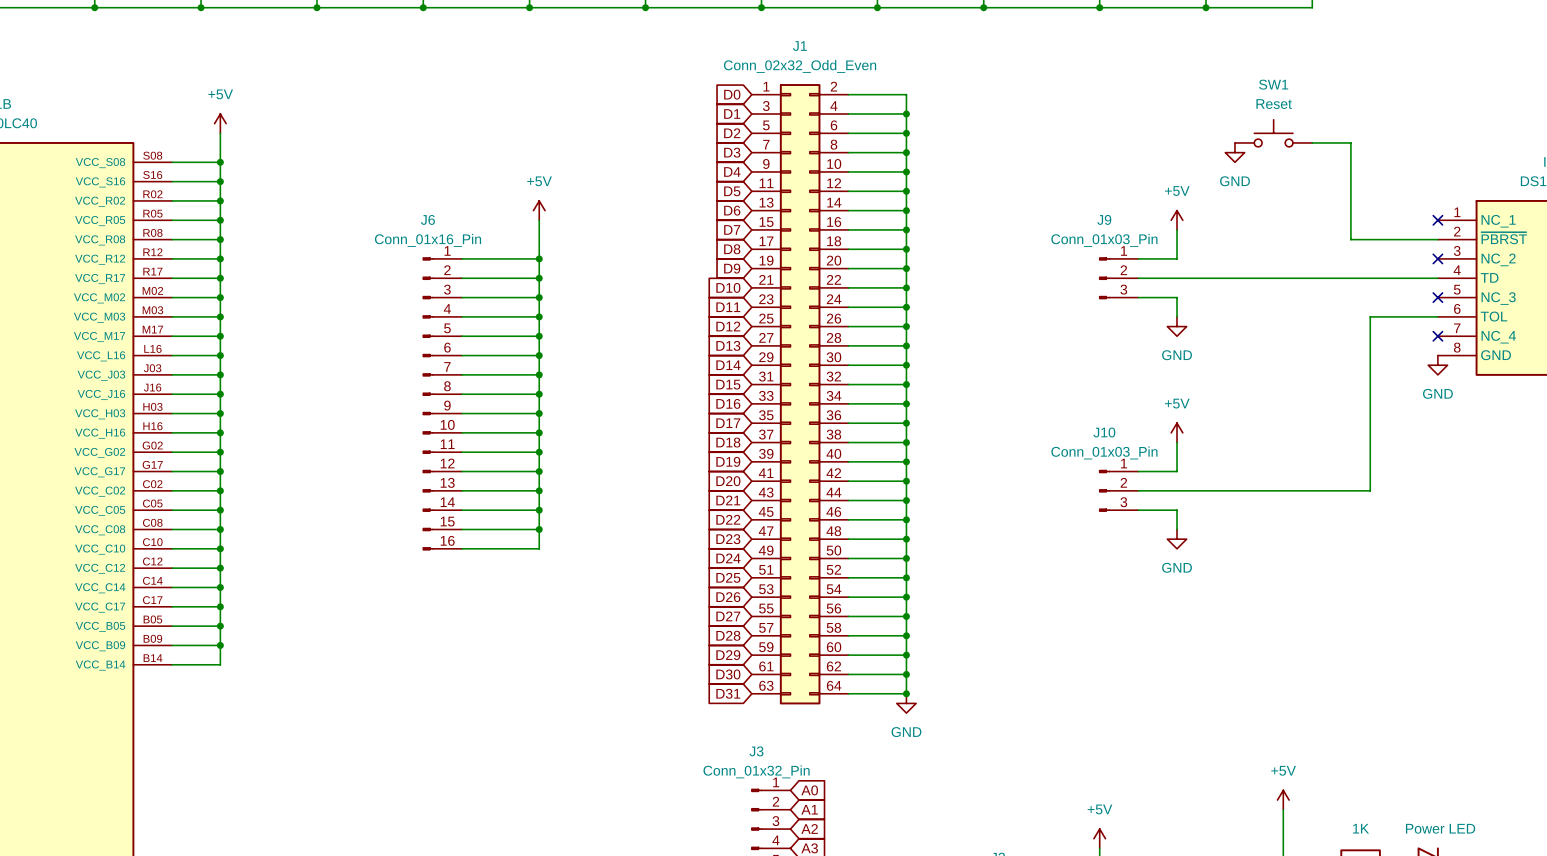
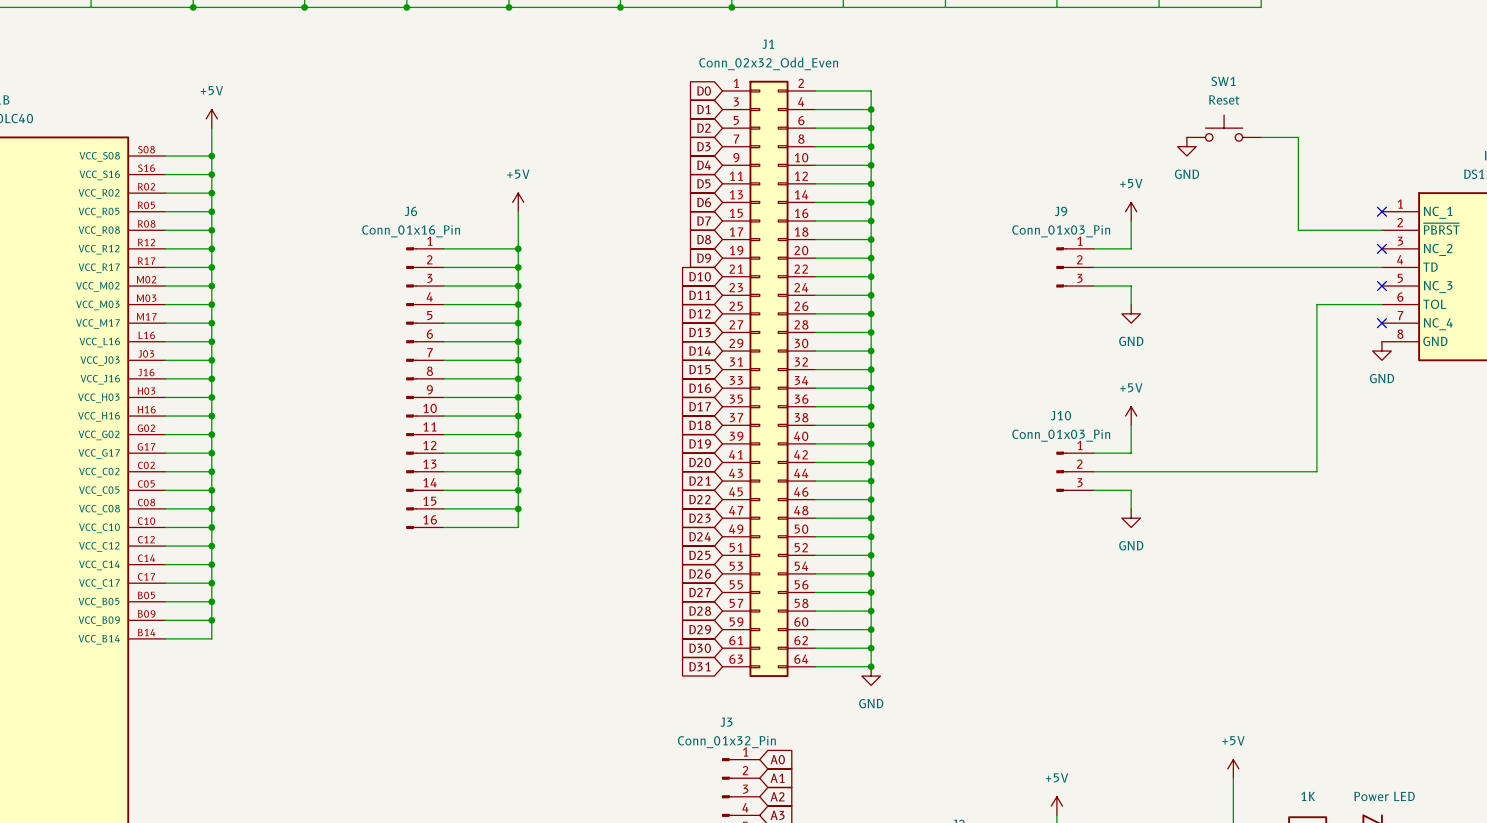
junction: (94, 7) -> none
junction: (877, 7) -> none
junction: (983, 7) -> none
junction: (1099, 7) -> none
junction: (1205, 7) -> none

